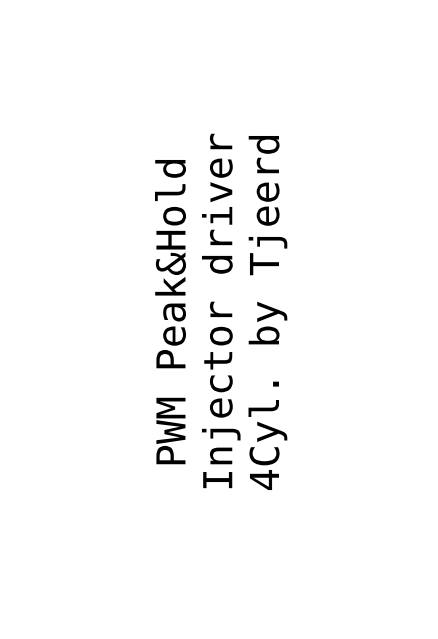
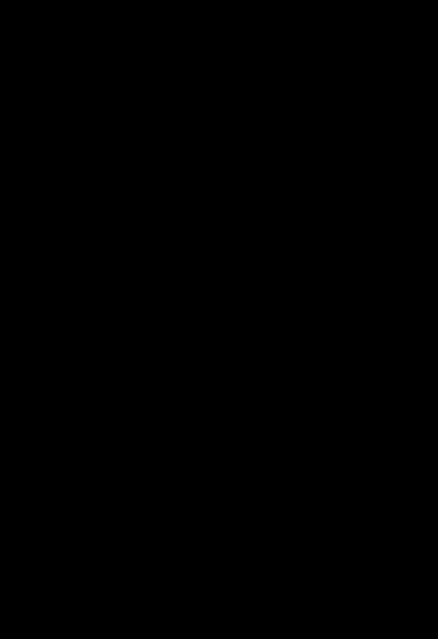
text: Injector driver (221, 310) -> none
text: PWM Peak&Hold (170, 312) -> none
text: 4Cyl. by Tjeerd (267, 313) -> none

